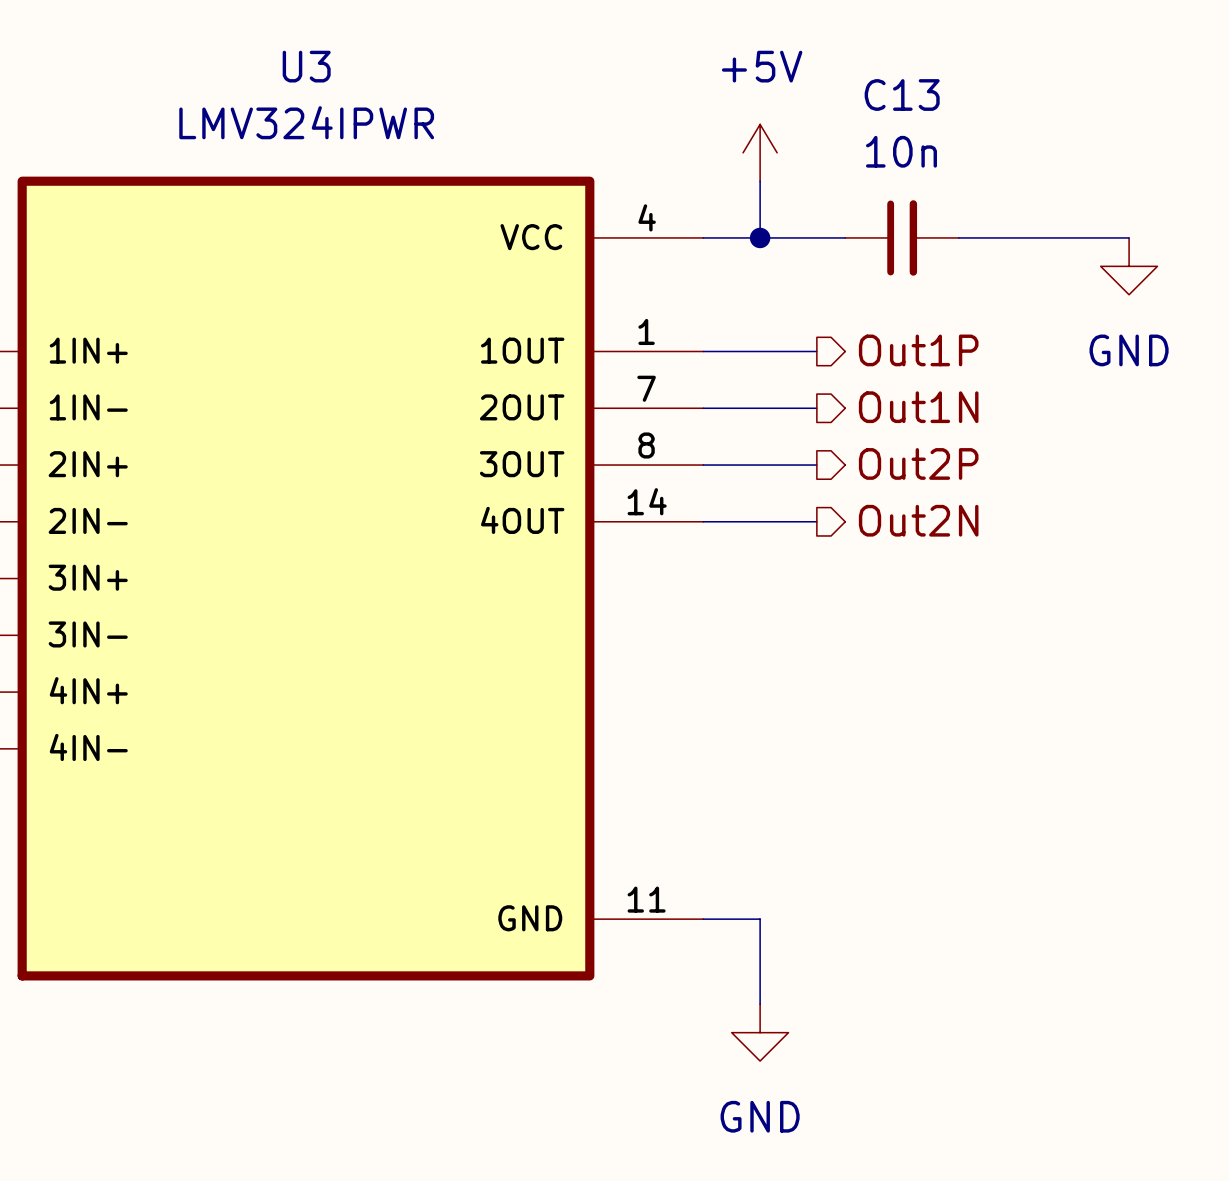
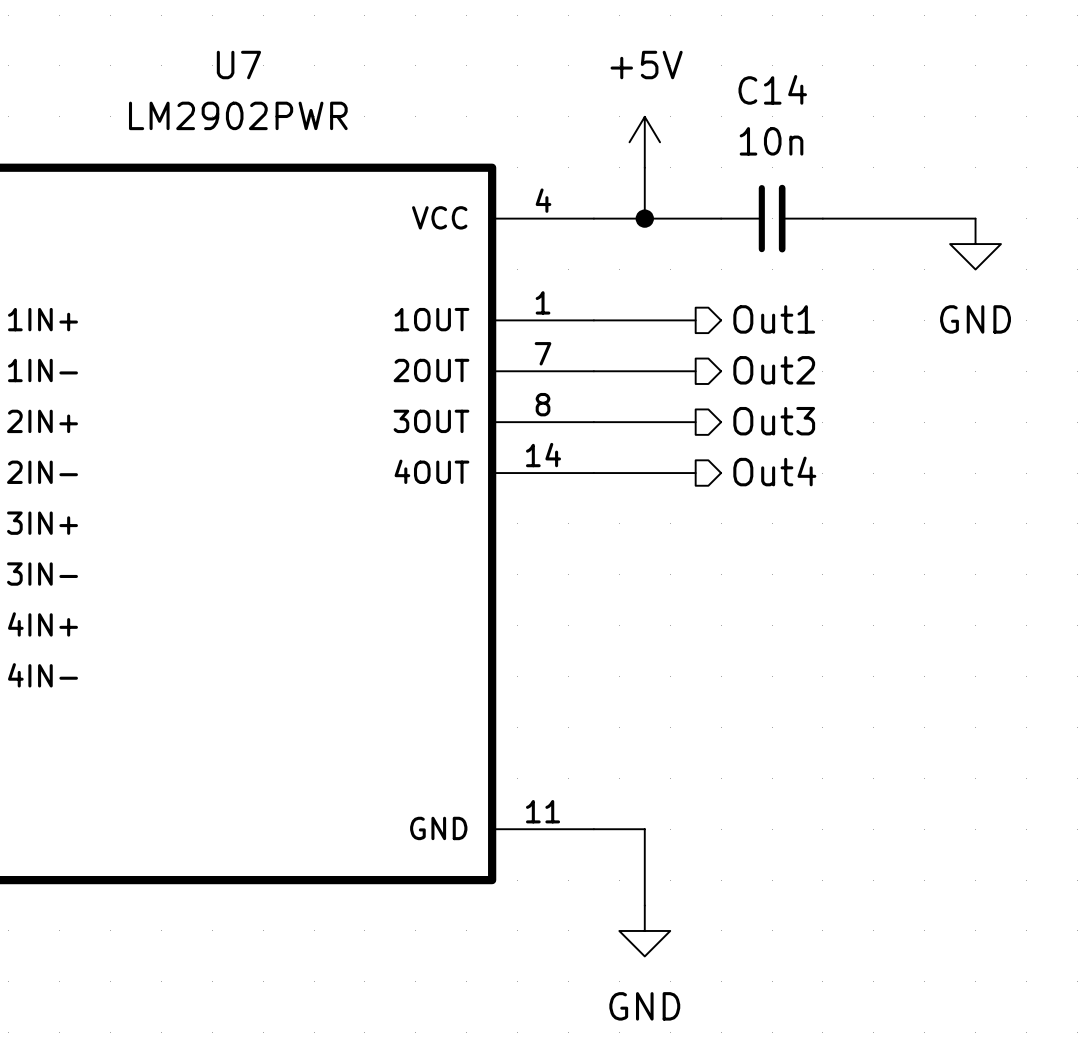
U3 name: U3 (306, 66) -> U7 (238, 65)
C13 name: C13 (902, 95) -> C14 (772, 89)
U3 value: LMV324IPWR (306, 122) -> LM2902PWR (238, 115)
hierarchical label: Out1P (918, 350) -> Out1 (774, 319)
hierarchical label: Out1N (918, 407) -> Out2 (774, 370)
hierarchical label: Out2P (918, 463) -> Out3 (774, 421)
hierarchical label: Out2N (918, 520) -> Out4 (774, 471)

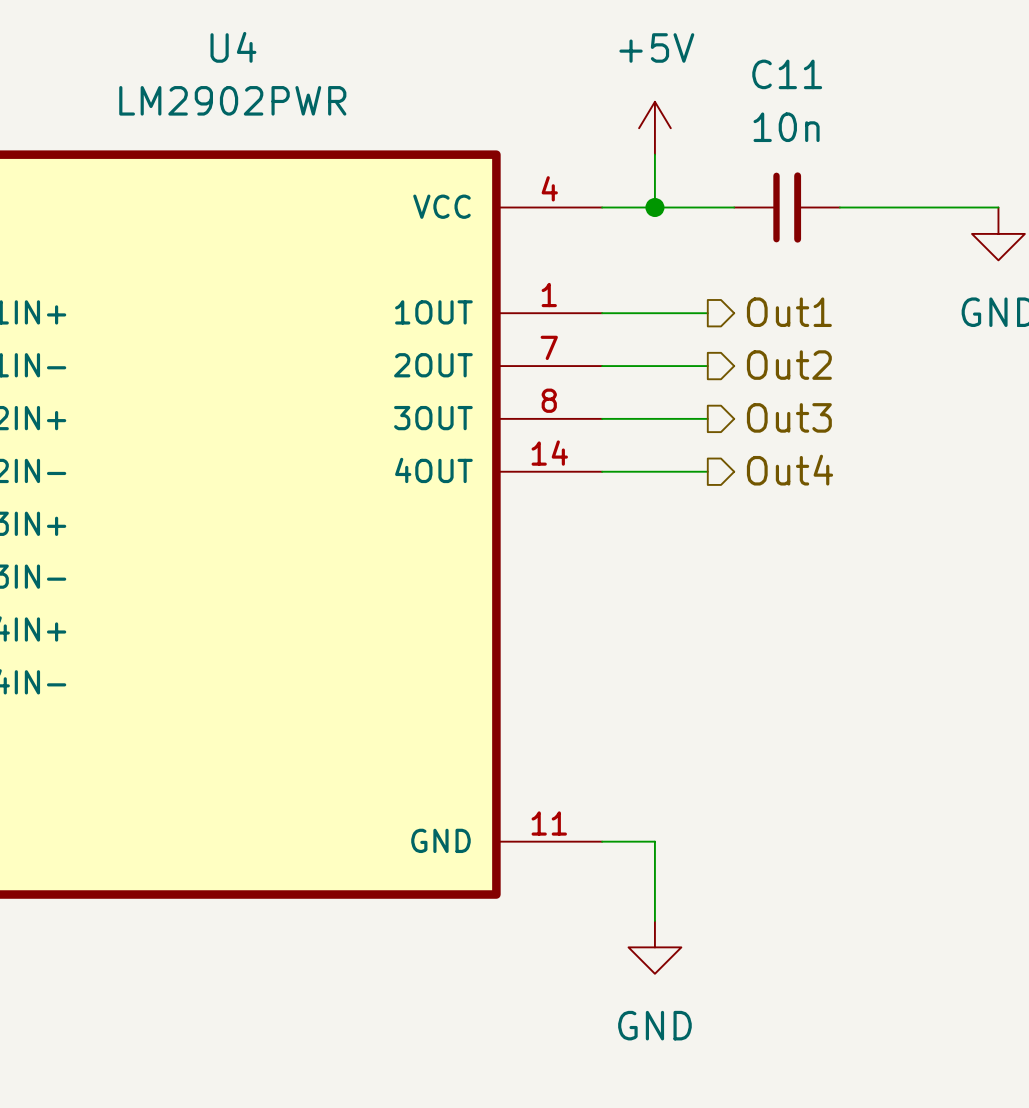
U7 name: U7 (238, 65) -> U4 (233, 47)
C14 name: C14 (772, 89) -> C11 (787, 74)

